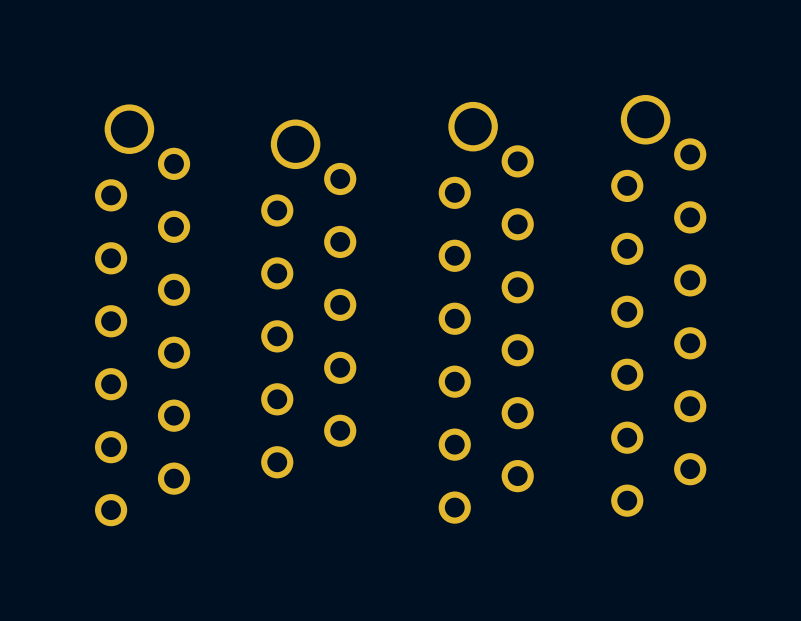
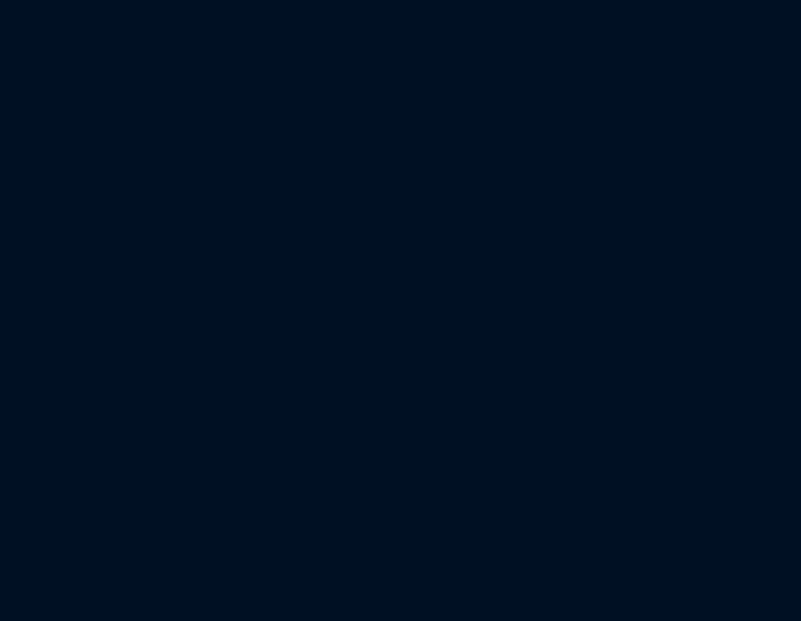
part: (308, 298) -> none
part: (658, 305) -> none
part: (486, 312) -> none
part: (142, 315) -> none

